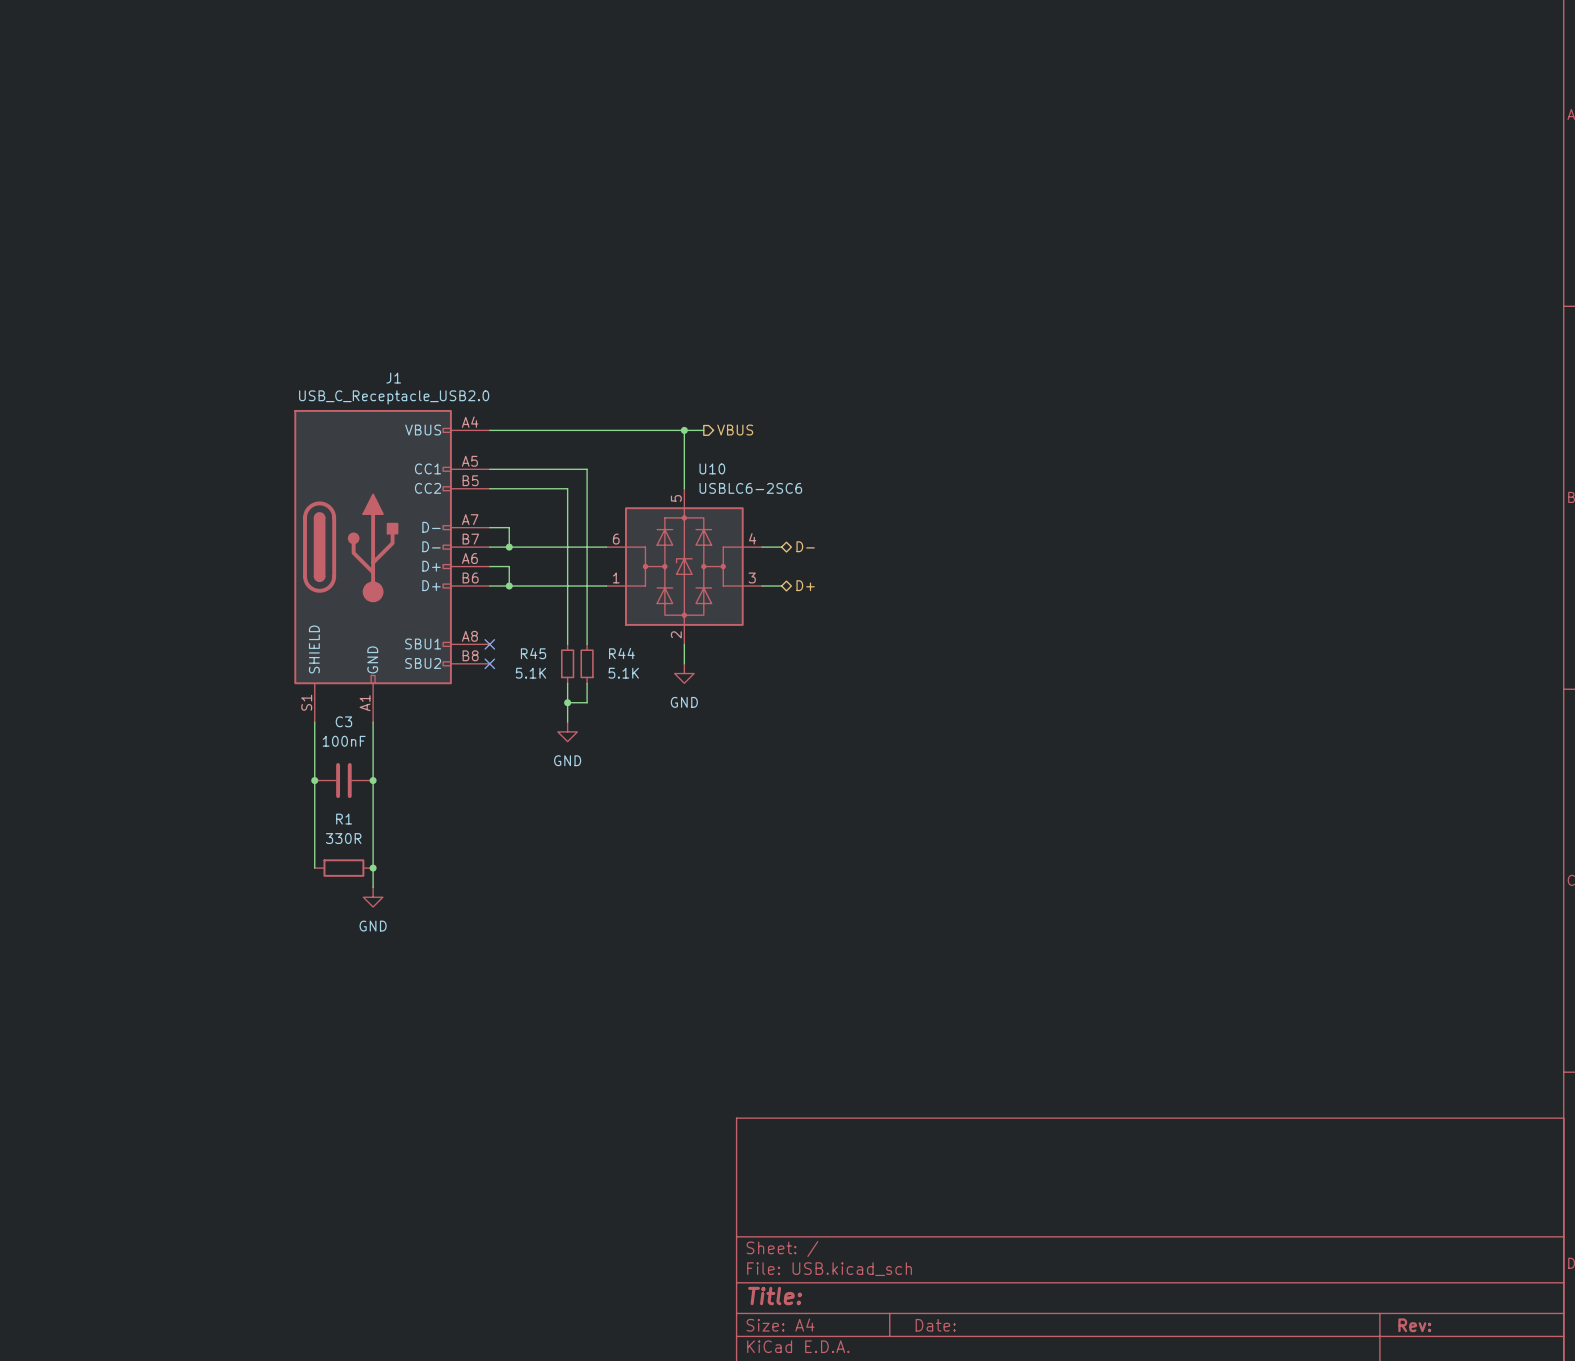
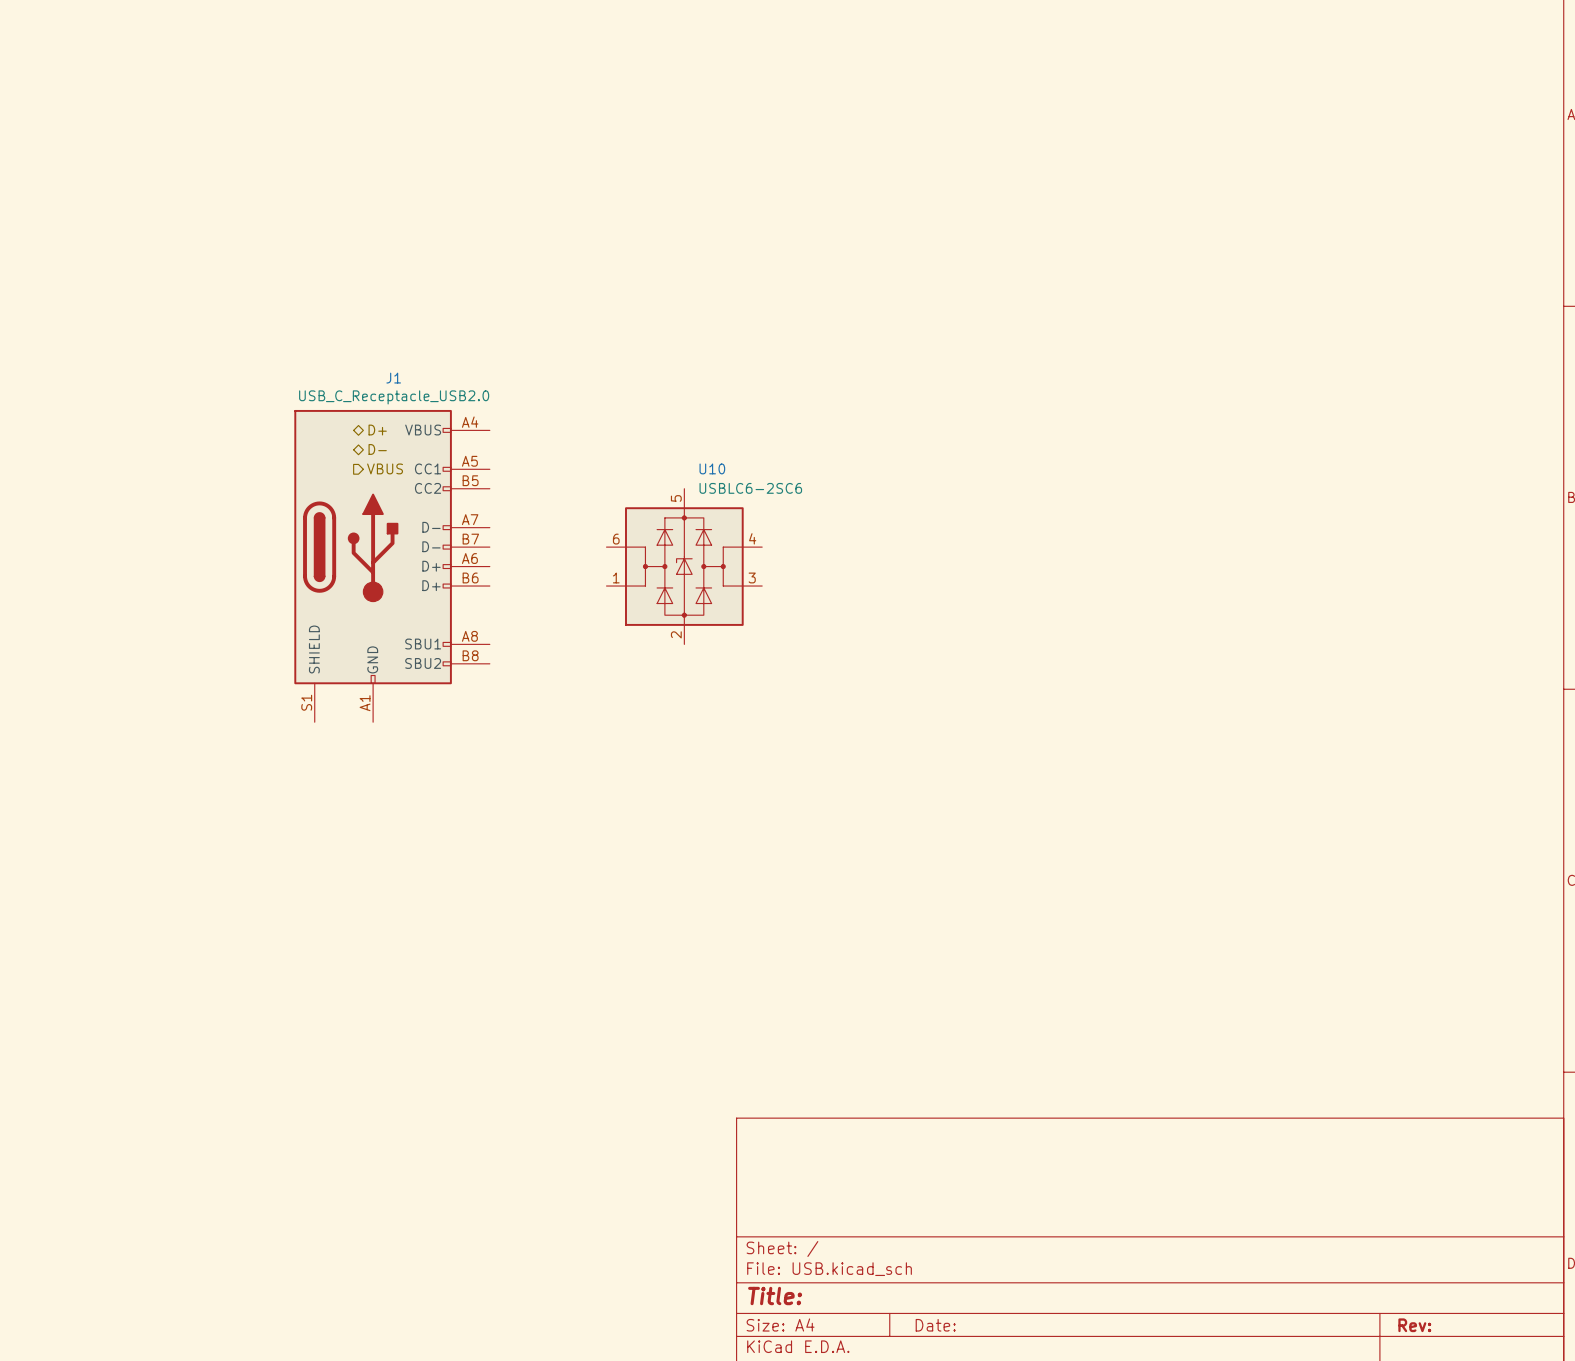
hierarchical label: none -> D+ (377, 430)
wire: (489, 430) (703, 430) -> none
wire: (684, 430) (684, 488) -> none
junction: (684, 430) -> none
hierarchical label: VBUS (735, 430) -> none
hierarchical label: none -> D- (377, 449)
hierarchical label: none -> VBUS (385, 468)
wire: (489, 469) (587, 469) (587, 644) -> none
wire: (489, 488) (567, 488) (567, 644) -> none
wire: (489, 527) (509, 527) (509, 547) -> none
hierarchical label: D- (805, 546) -> none
wire: (489, 547) (606, 547) -> none
junction: (509, 547) -> none
wire: (762, 547) (781, 547) -> none
wire: (489, 566) (509, 566) (509, 586) -> none
hierarchical label: D+ (805, 585) -> none
wire: (489, 586) (606, 586) -> none
junction: (509, 586) -> none
wire: (762, 586) (781, 586) -> none
no-connect mark: (489, 644) -> none
wire: (684, 644) (684, 663) -> none
no-connect mark: (489, 663) -> none
R45: 5.1K (567, 663) -> none
R44: 5.1K (587, 663) -> none
power symbol: GND (684, 673) -> none
wire: (567, 683) (567, 722) -> none
wire: (587, 683) (587, 702) (567, 702) -> none
junction: (567, 702) -> none
wire: (314, 722) (314, 868) -> none
wire: (373, 722) (373, 887) -> none
power symbol: GND (567, 731) -> none
junction: (314, 780) -> none
C3: 100nF (343, 780) -> none
junction: (373, 780) -> none
R1: 330R (343, 868) -> none
junction: (373, 868) -> none
power symbol: GND (373, 897) -> none

